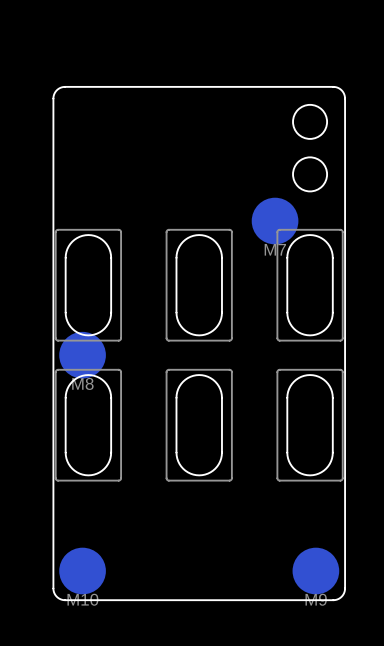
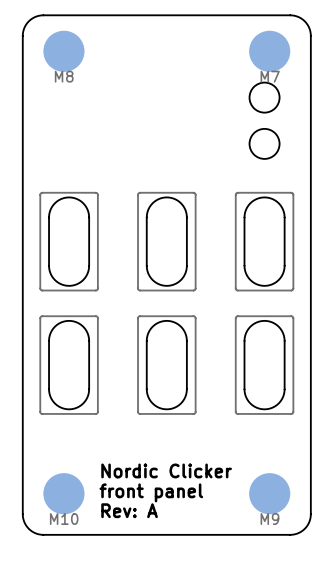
board edge: (333, 86) (65, 86) (58, 88) (54, 93) (53, 588) (55, 594) (60, 599) (333, 600) (339, 598) (343, 593) (345, 98) (341, 90) (333, 86) -> (290, 15) (299, 17) (304, 21) (309, 29) (310, 35) (310, 514) (308, 523) (301, 531) (290, 534) (43, 534) (34, 532) (25, 525) (22, 514) (22, 35) (24, 26) (32, 18) (43, 15) (290, 15)
M7 position: (275, 221) -> (269, 51)
M8 position: (82, 355) -> (63, 51)
text: none -> Nordic Clicker (166, 470)
text: none -> front panel (151, 492)
text: none -> Rev: A (129, 510)

